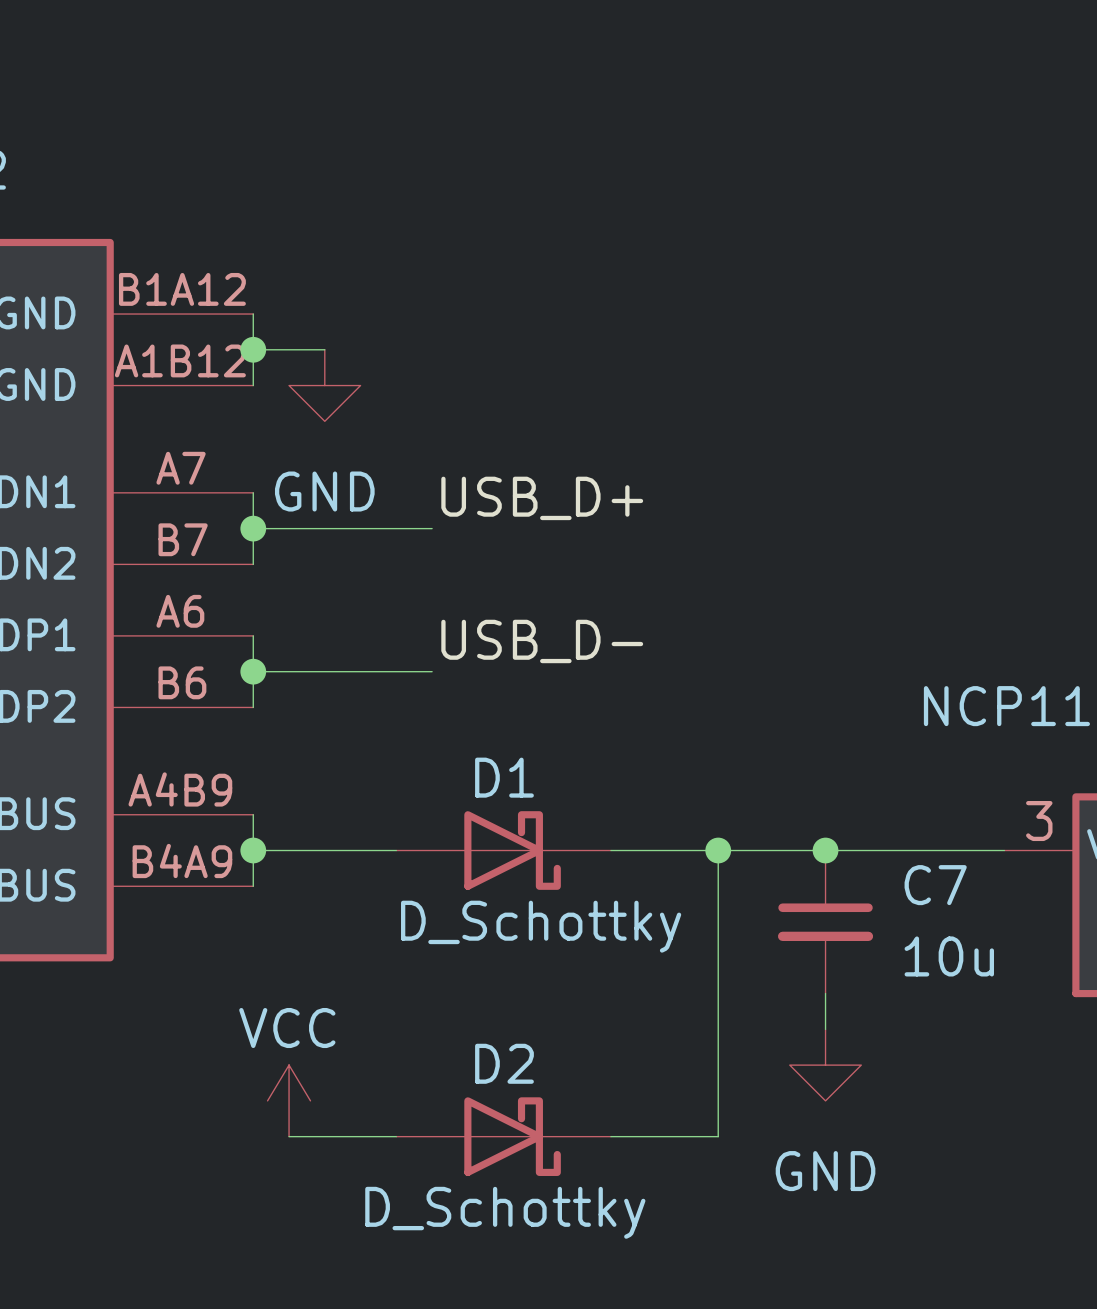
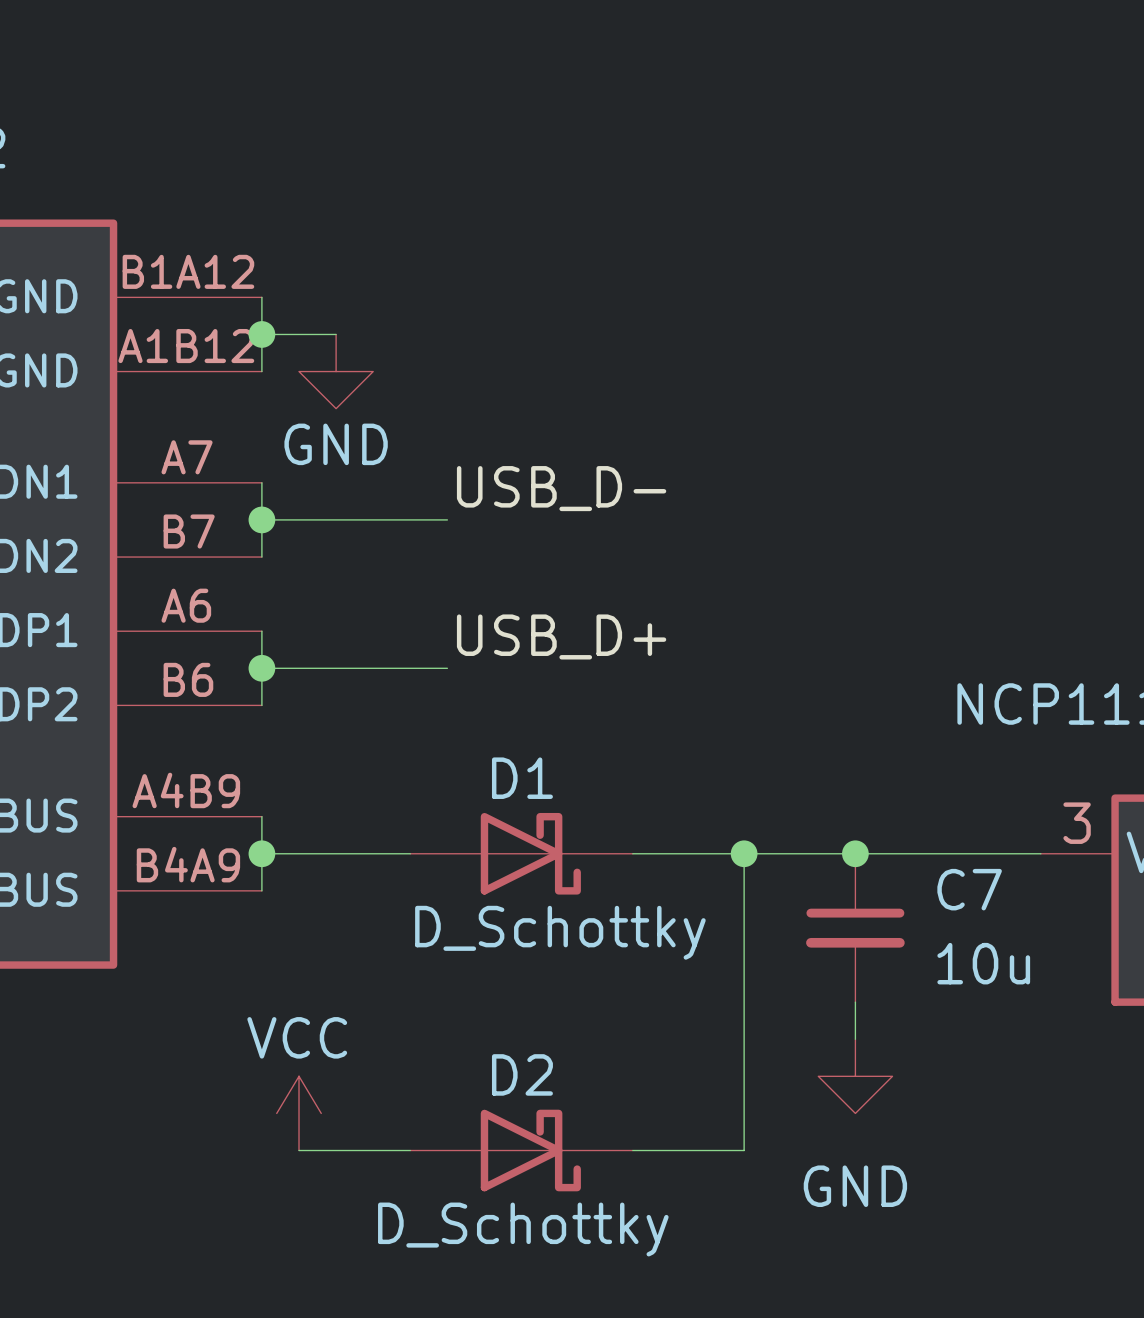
power symbol text position: GND (324, 491) -> GND (336, 444)
label: USB_D+ (542, 498) -> USB_D- (561, 488)
label: USB_D- (542, 641) -> USB_D+ (561, 636)

